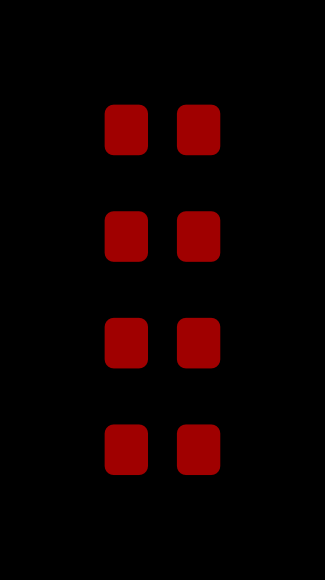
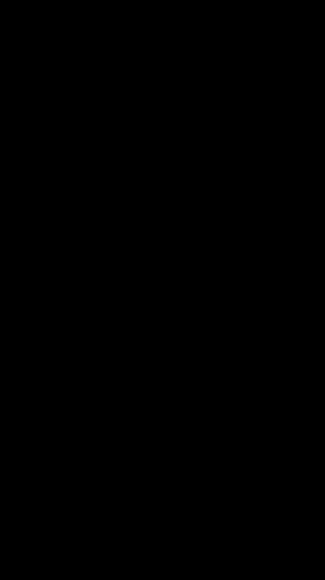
part: (162, 129) -> none
part: (162, 236) -> none
part: (162, 343) -> none
part: (162, 449) -> none

